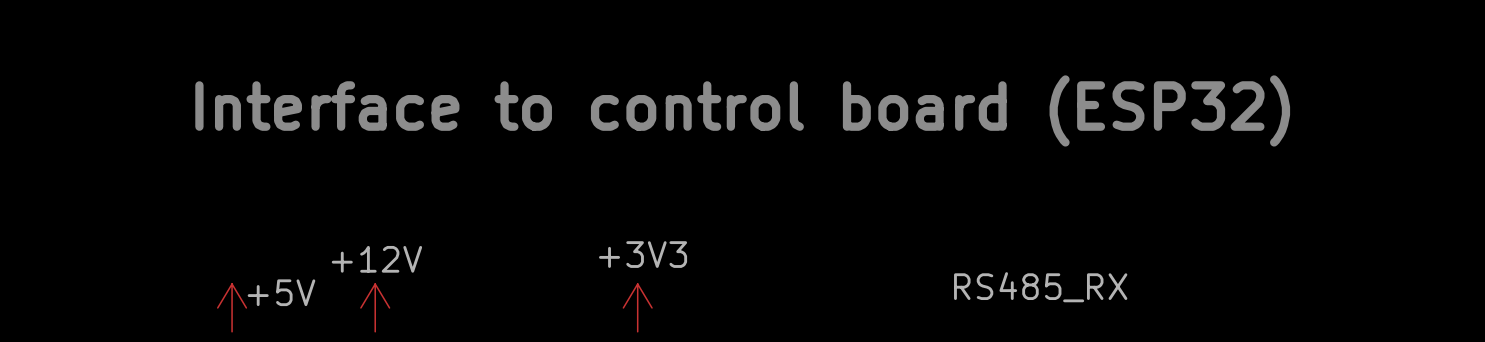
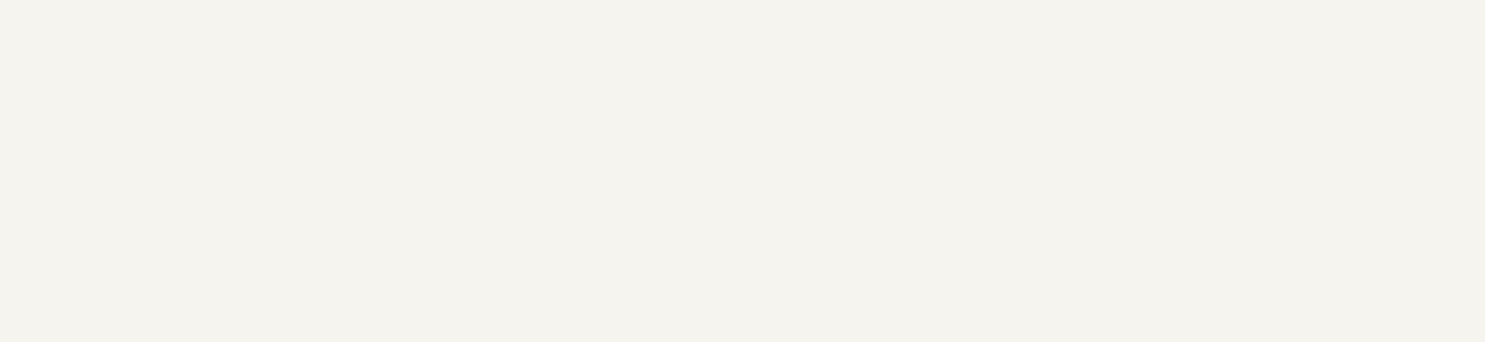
text: Interface to control board (ESP32) (742, 110) -> none
label: RS485_RX (1040, 287) -> none
power symbol: +5V (232, 307) -> none
power symbol: +12V (375, 307) -> none
power symbol: +3V3 (637, 307) -> none

